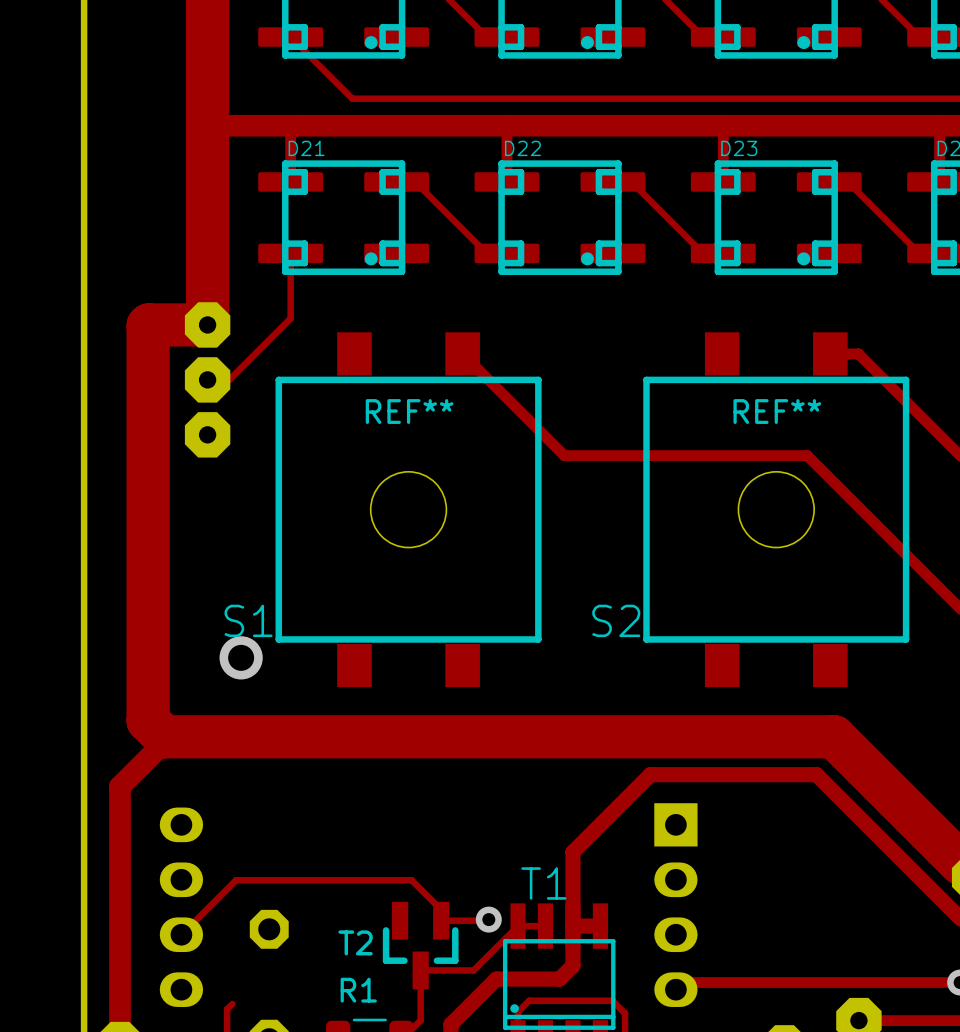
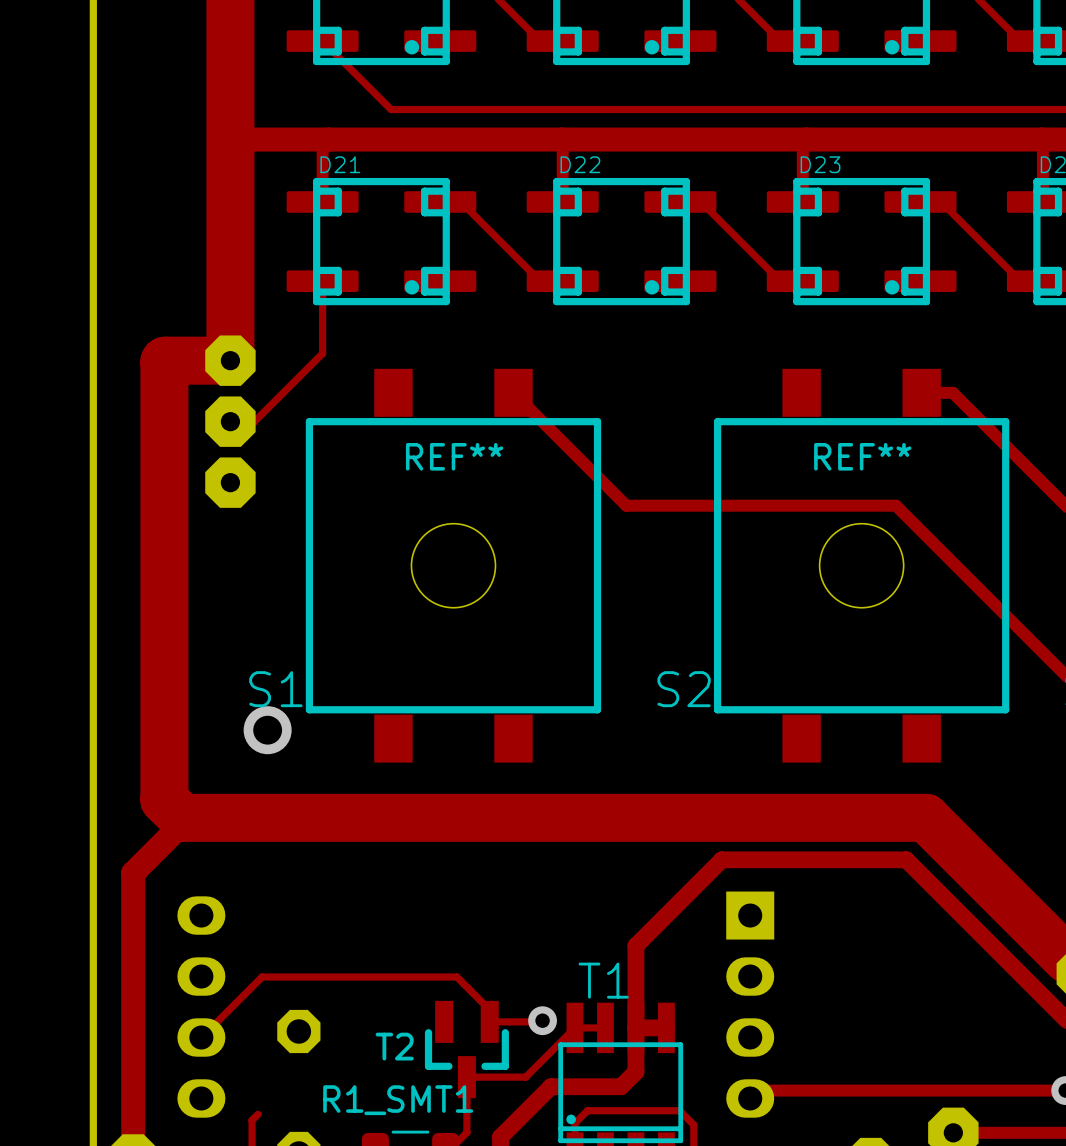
R1 name: R1 (358, 990) -> R1_SMT1 (398, 1100)

